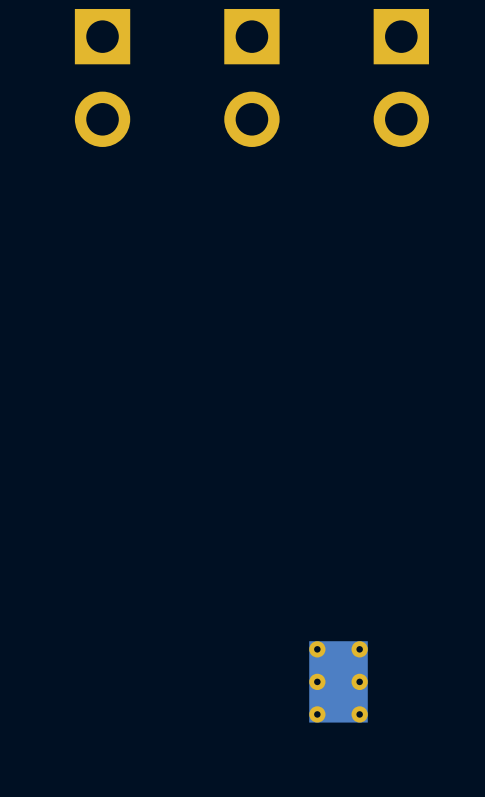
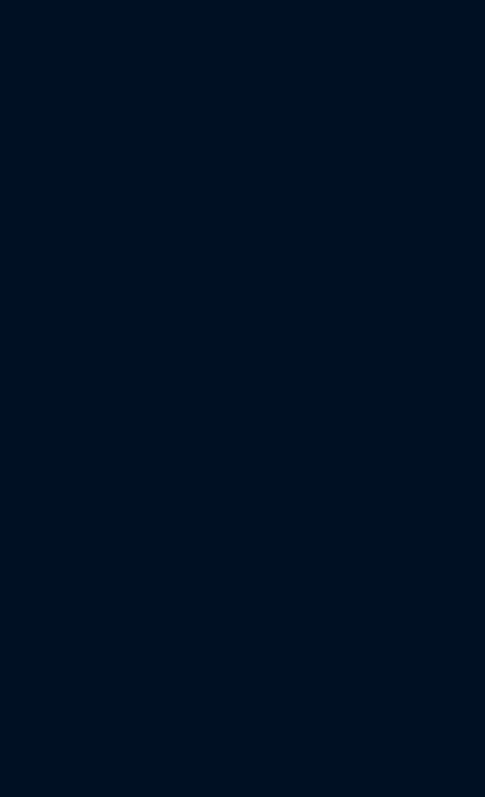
part: (102, 77) -> none
part: (251, 77) -> none
part: (401, 77) -> none
part: (338, 681) -> none

